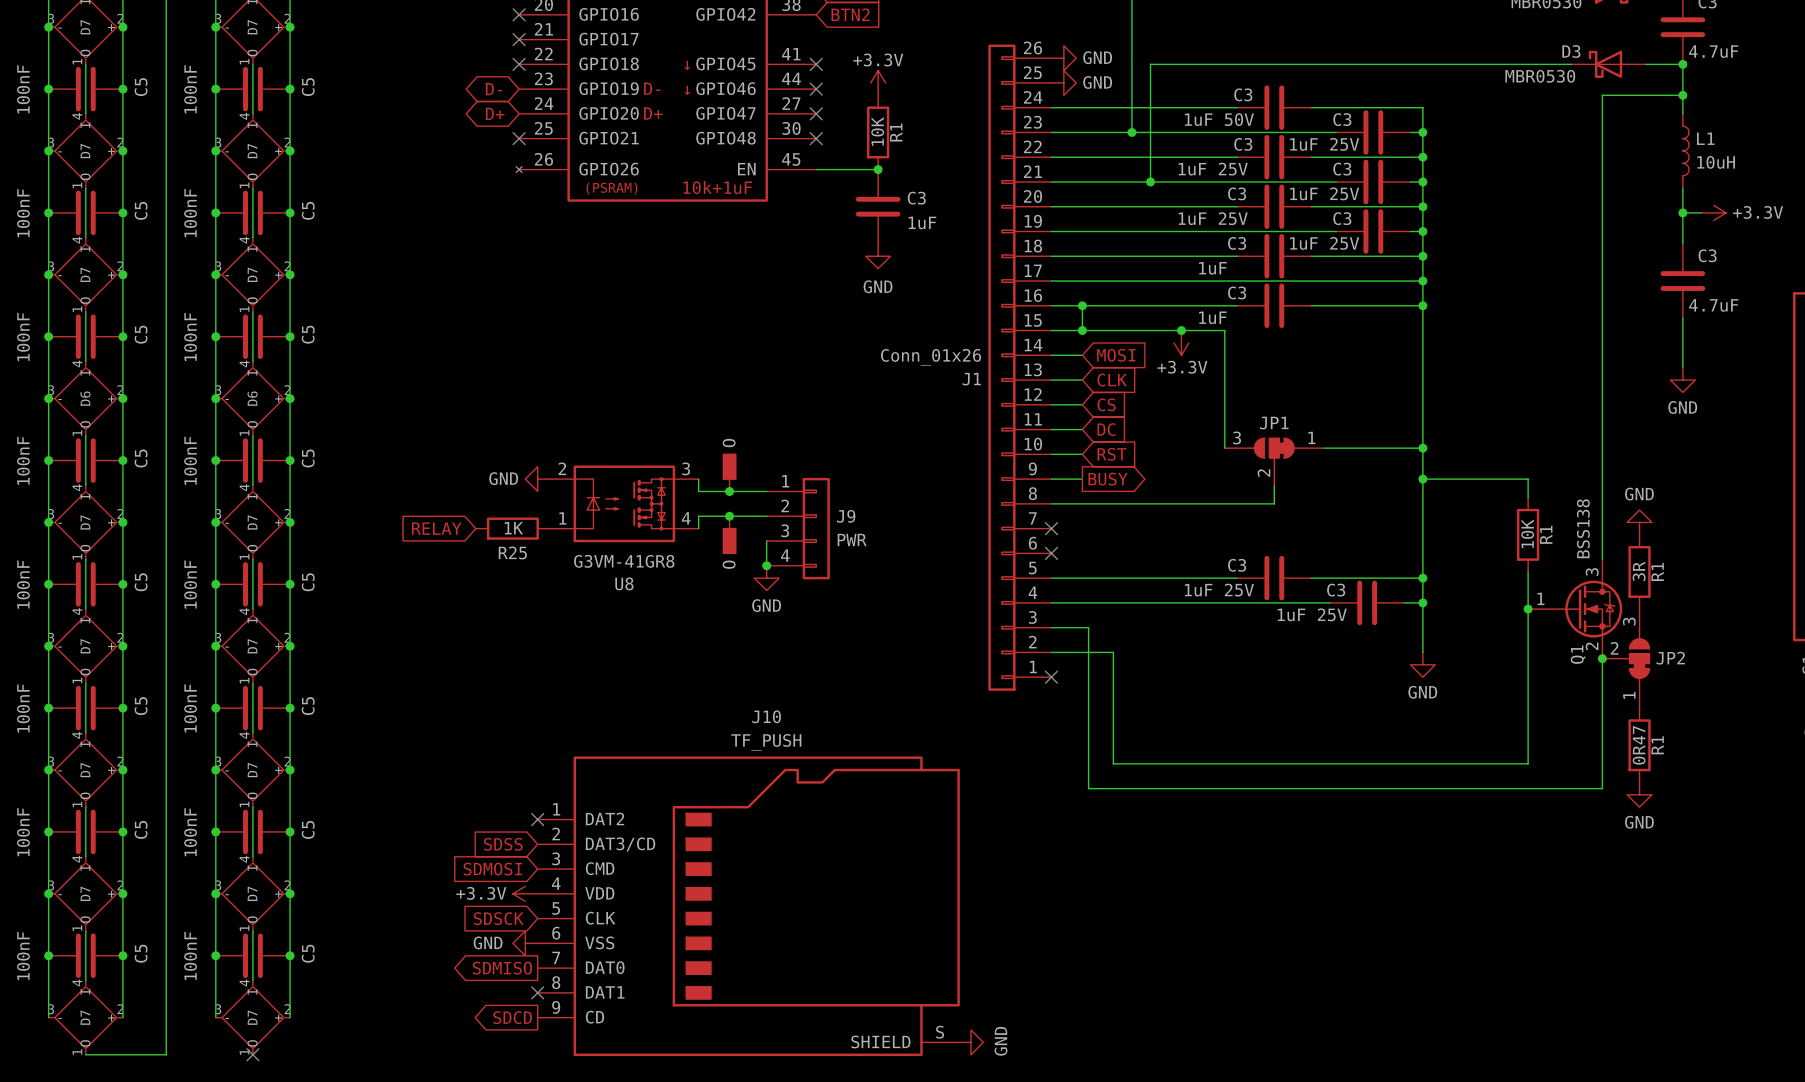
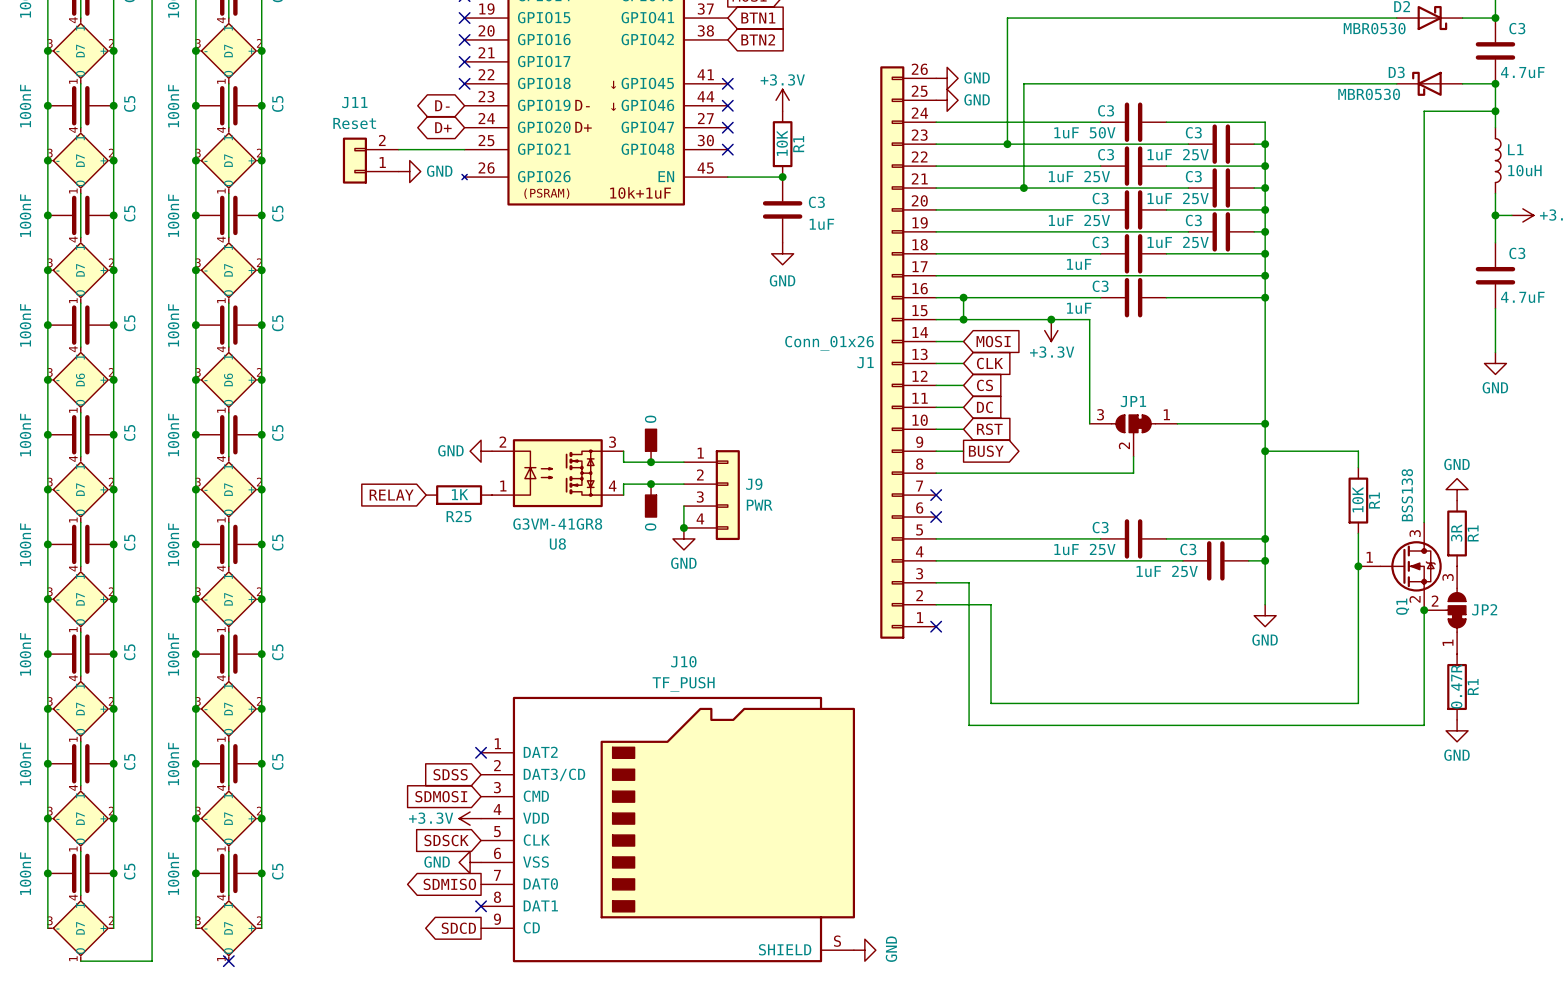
wire: none -> (398, 149) (464, 149)
no-connect mark: (519, 138) -> none
J11: none -> Reset (370, 160)
power symbol: none -> GND (409, 171)
R1 value: 0R47 (1639, 745) -> 0.47R (1456, 686)

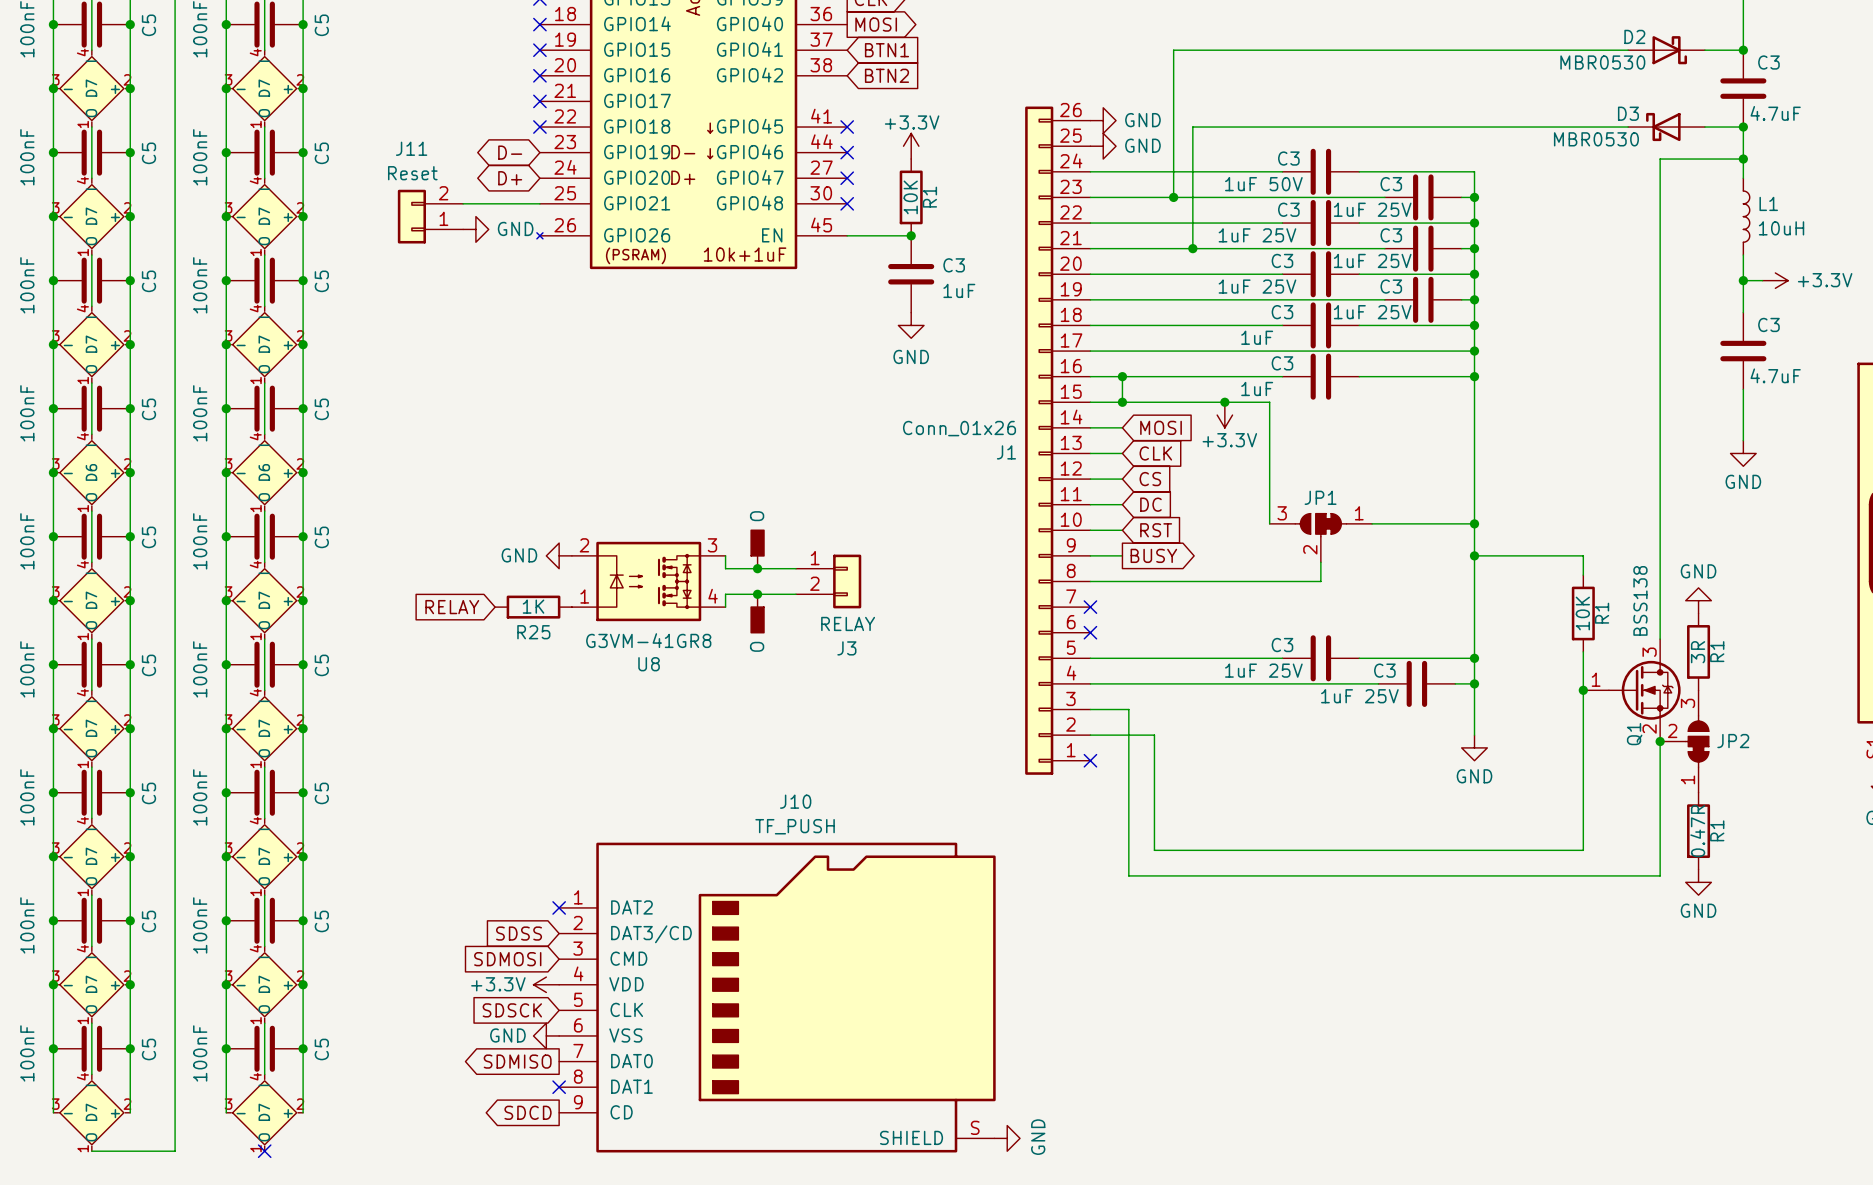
J3: none -> RELAY (828, 581)
J9: PWR (711, 495) -> none
wire: (683, 506) (683, 527) -> none
junction: (683, 527) -> none
power symbol: GND (683, 538) -> none

